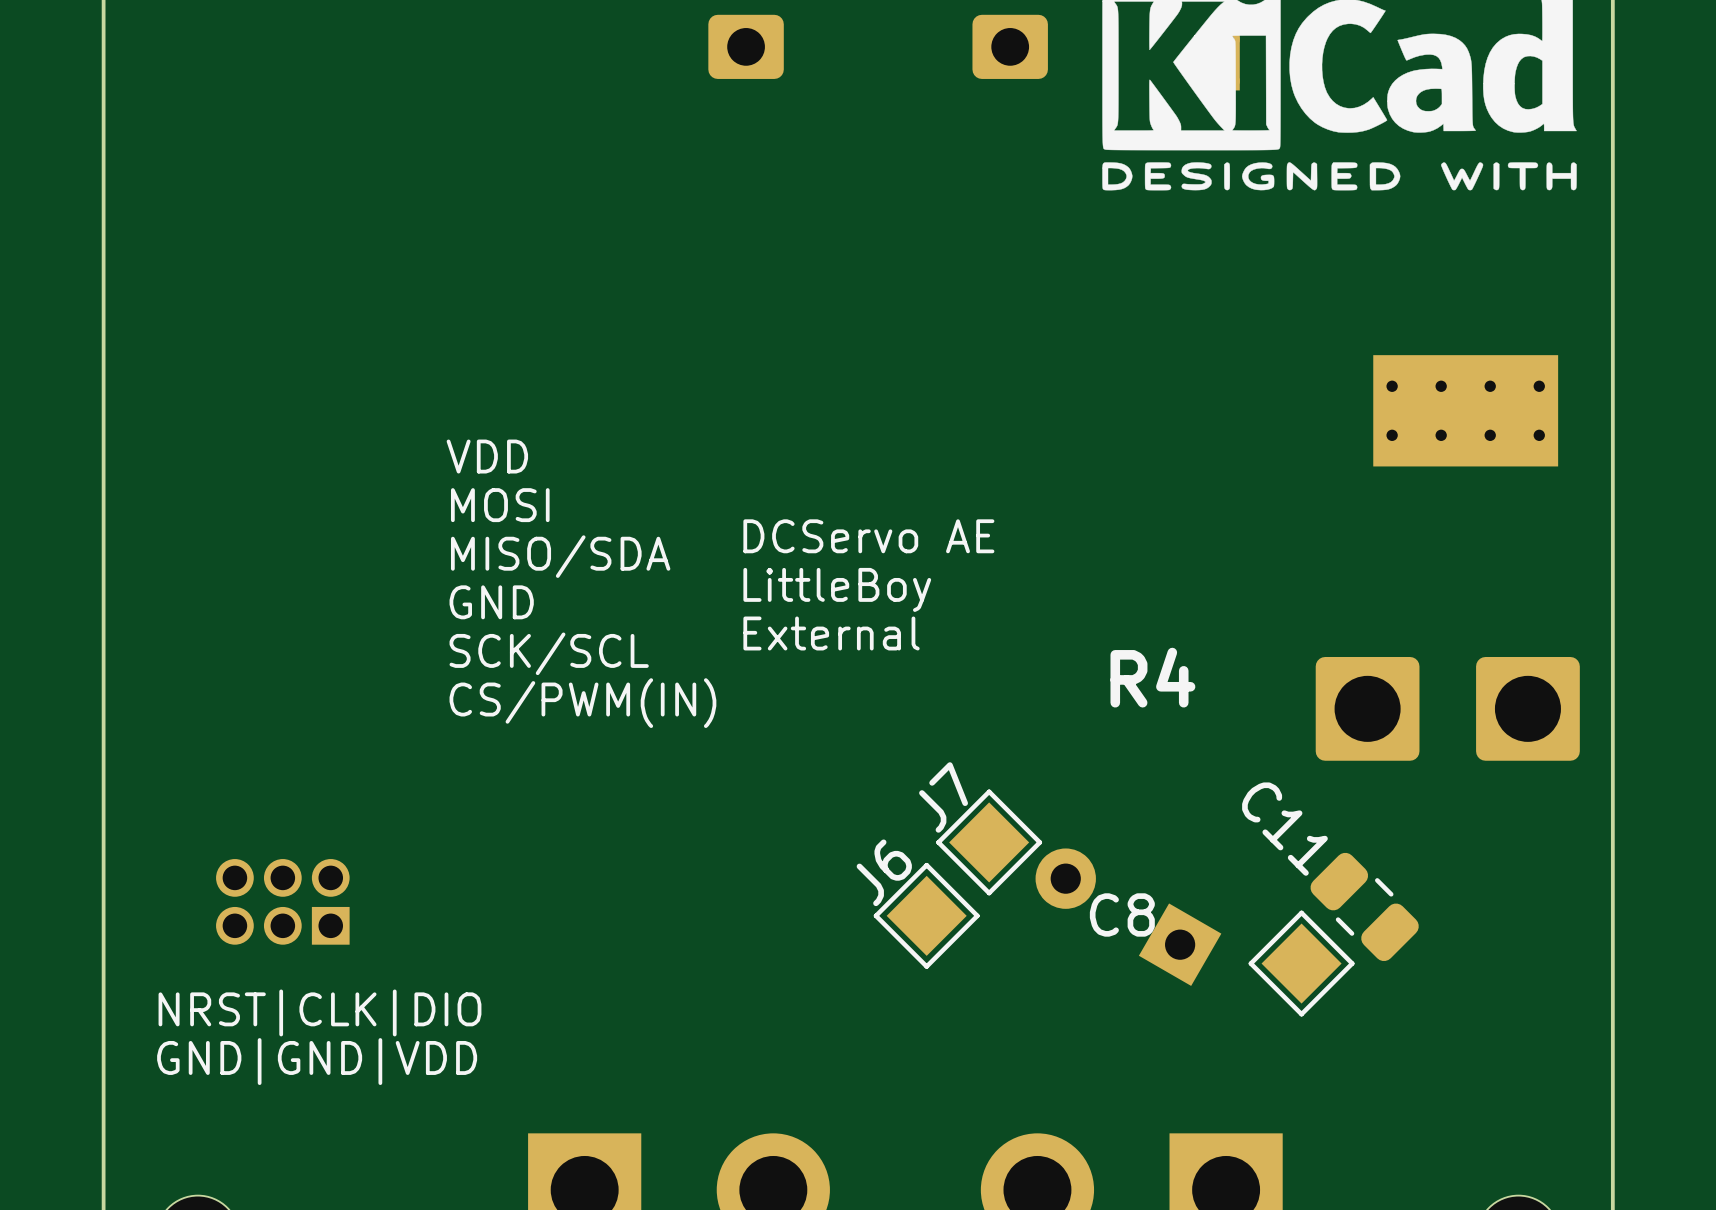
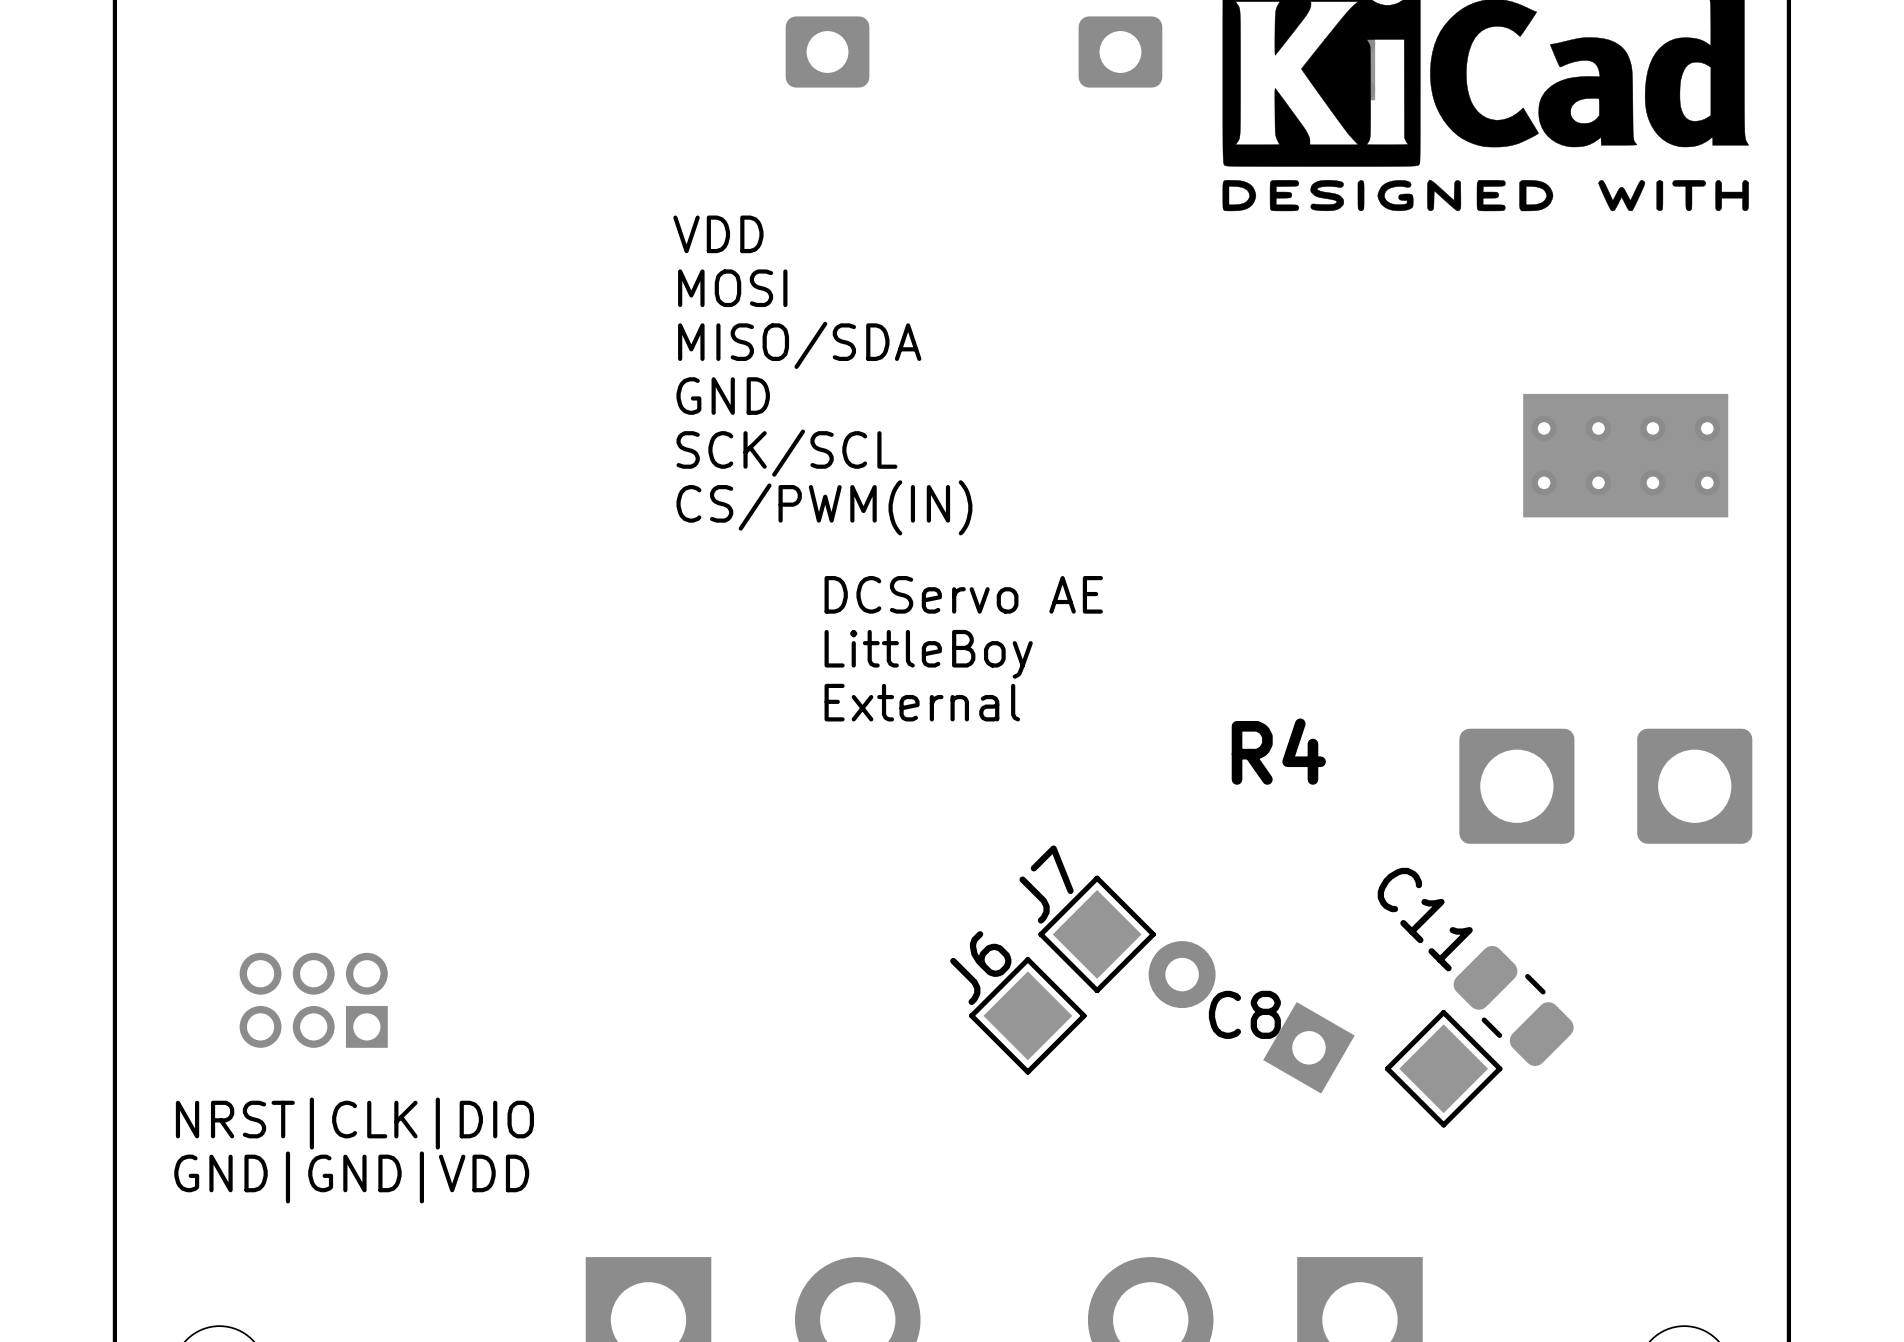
text position: VDD (487, 456) -> VDD (718, 234)
text position: MOSI (500, 505) -> MOSI (732, 288)
text position: MISO/SDA (560, 556) -> MISO/SDA (799, 345)
text position: GND (491, 602) -> GND (723, 396)
text position: SCK/SCL (549, 653) -> SCK/SCL (786, 453)
text position: CS/PWM(IN) (582, 703) -> CS/PWM(IN) (824, 507)

